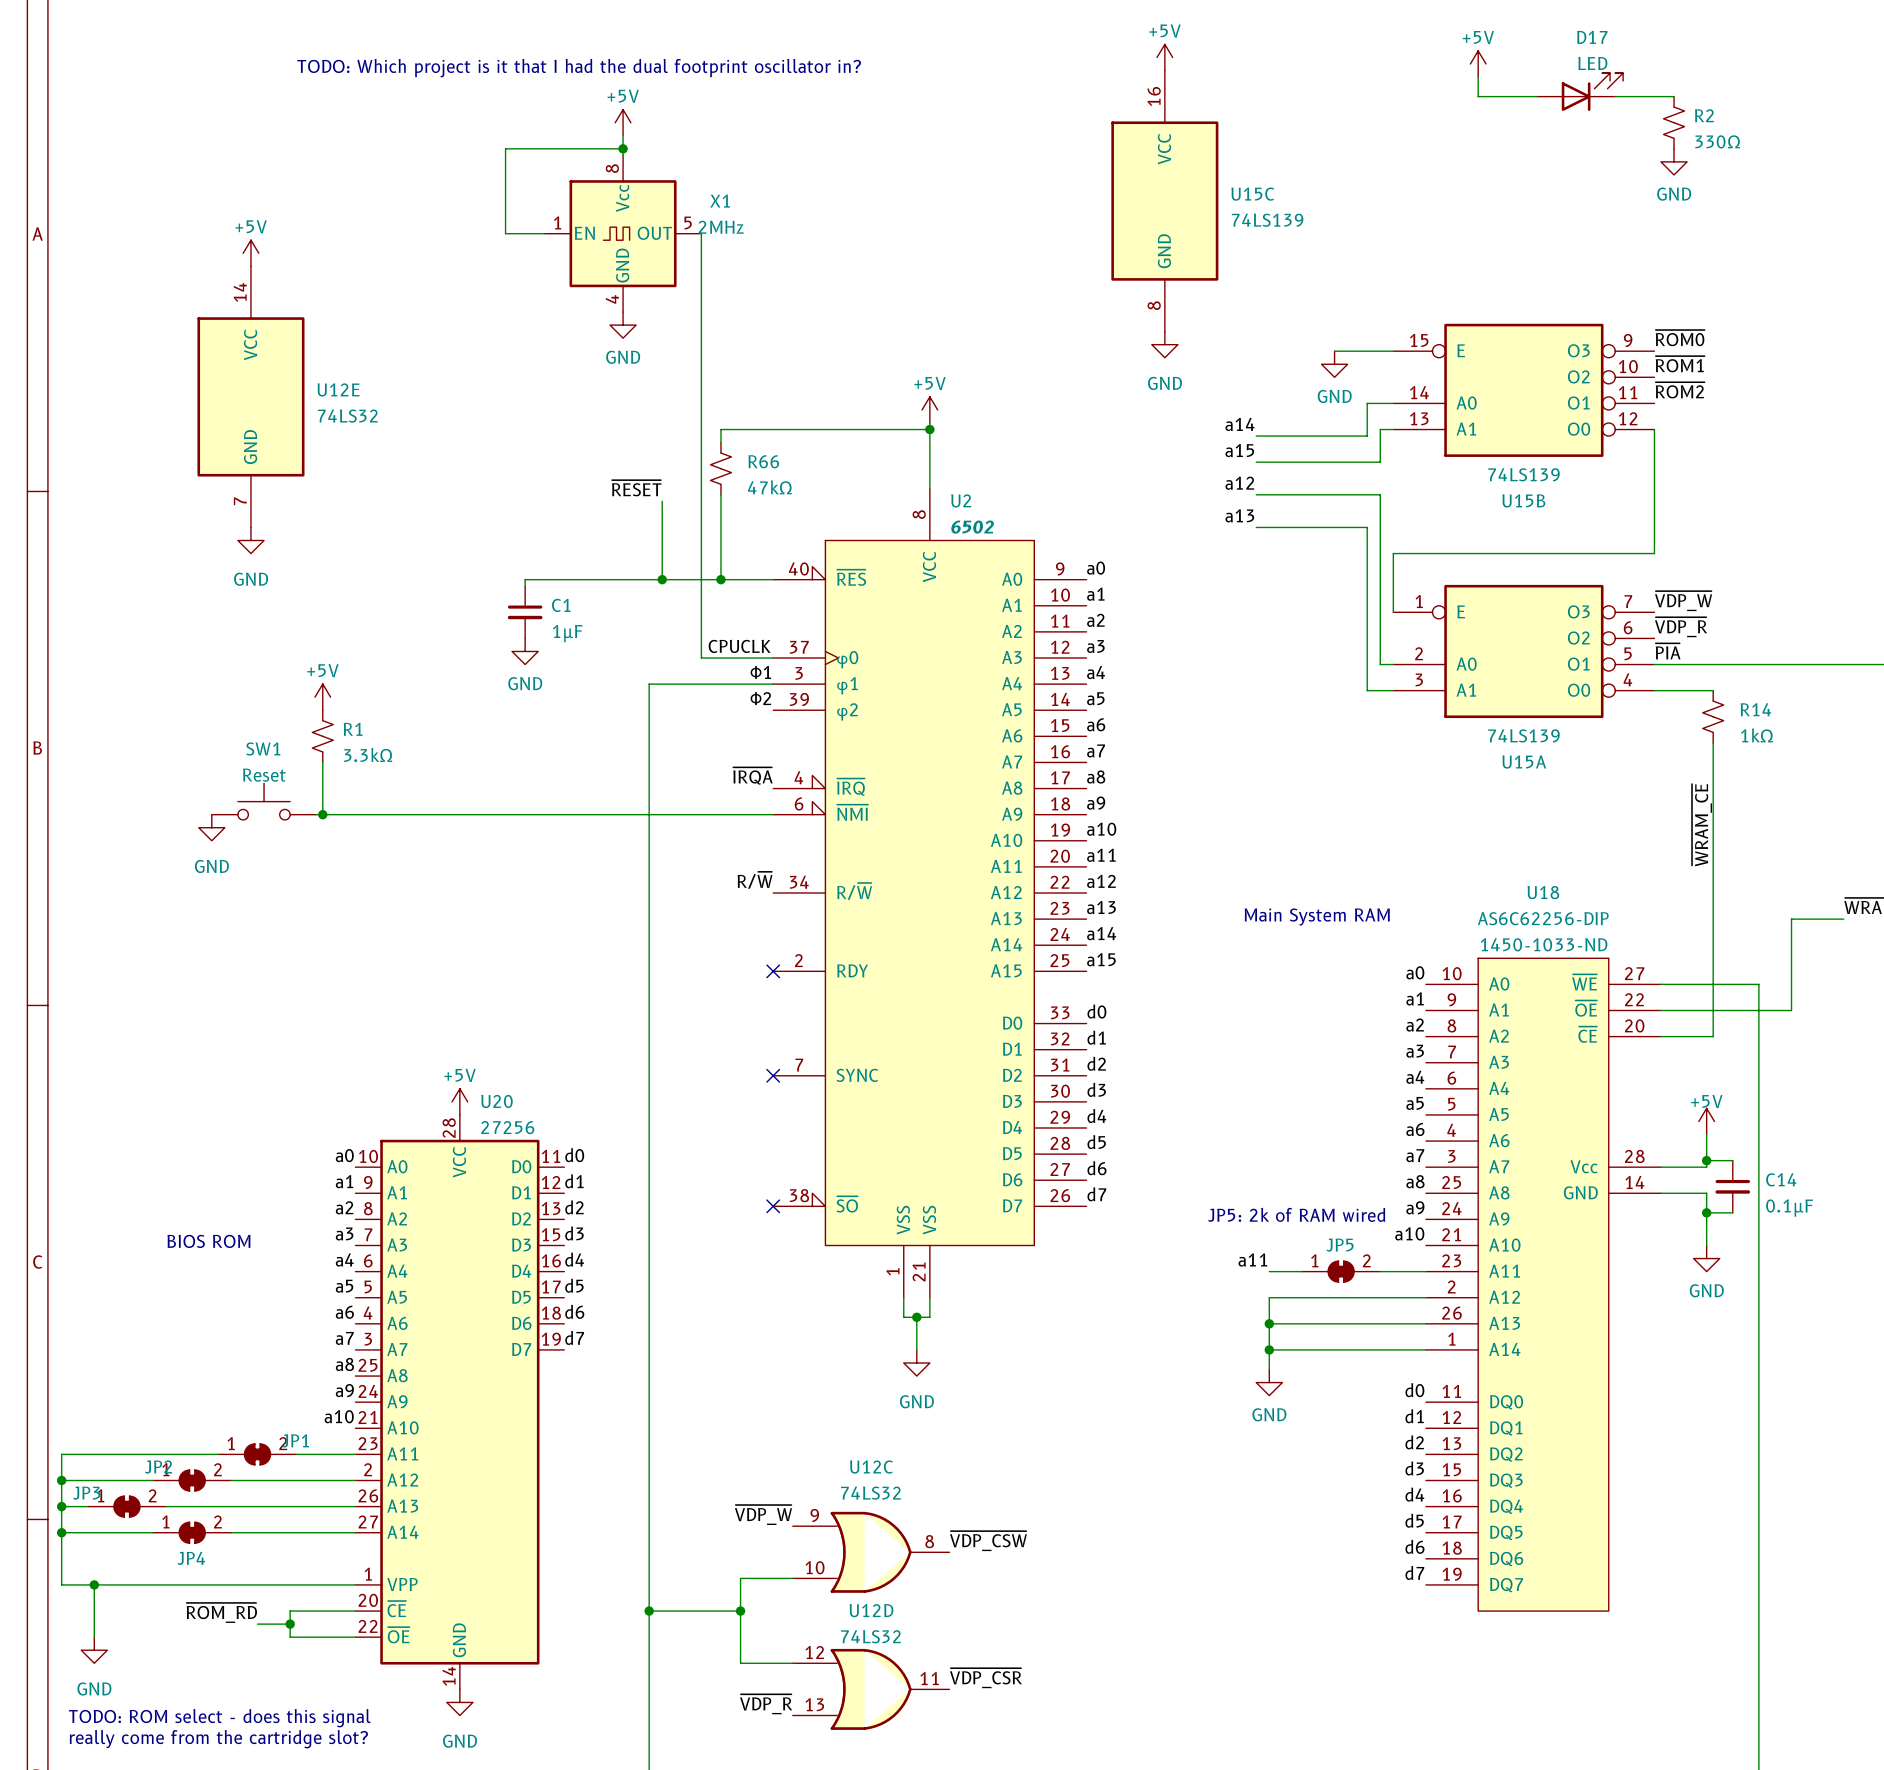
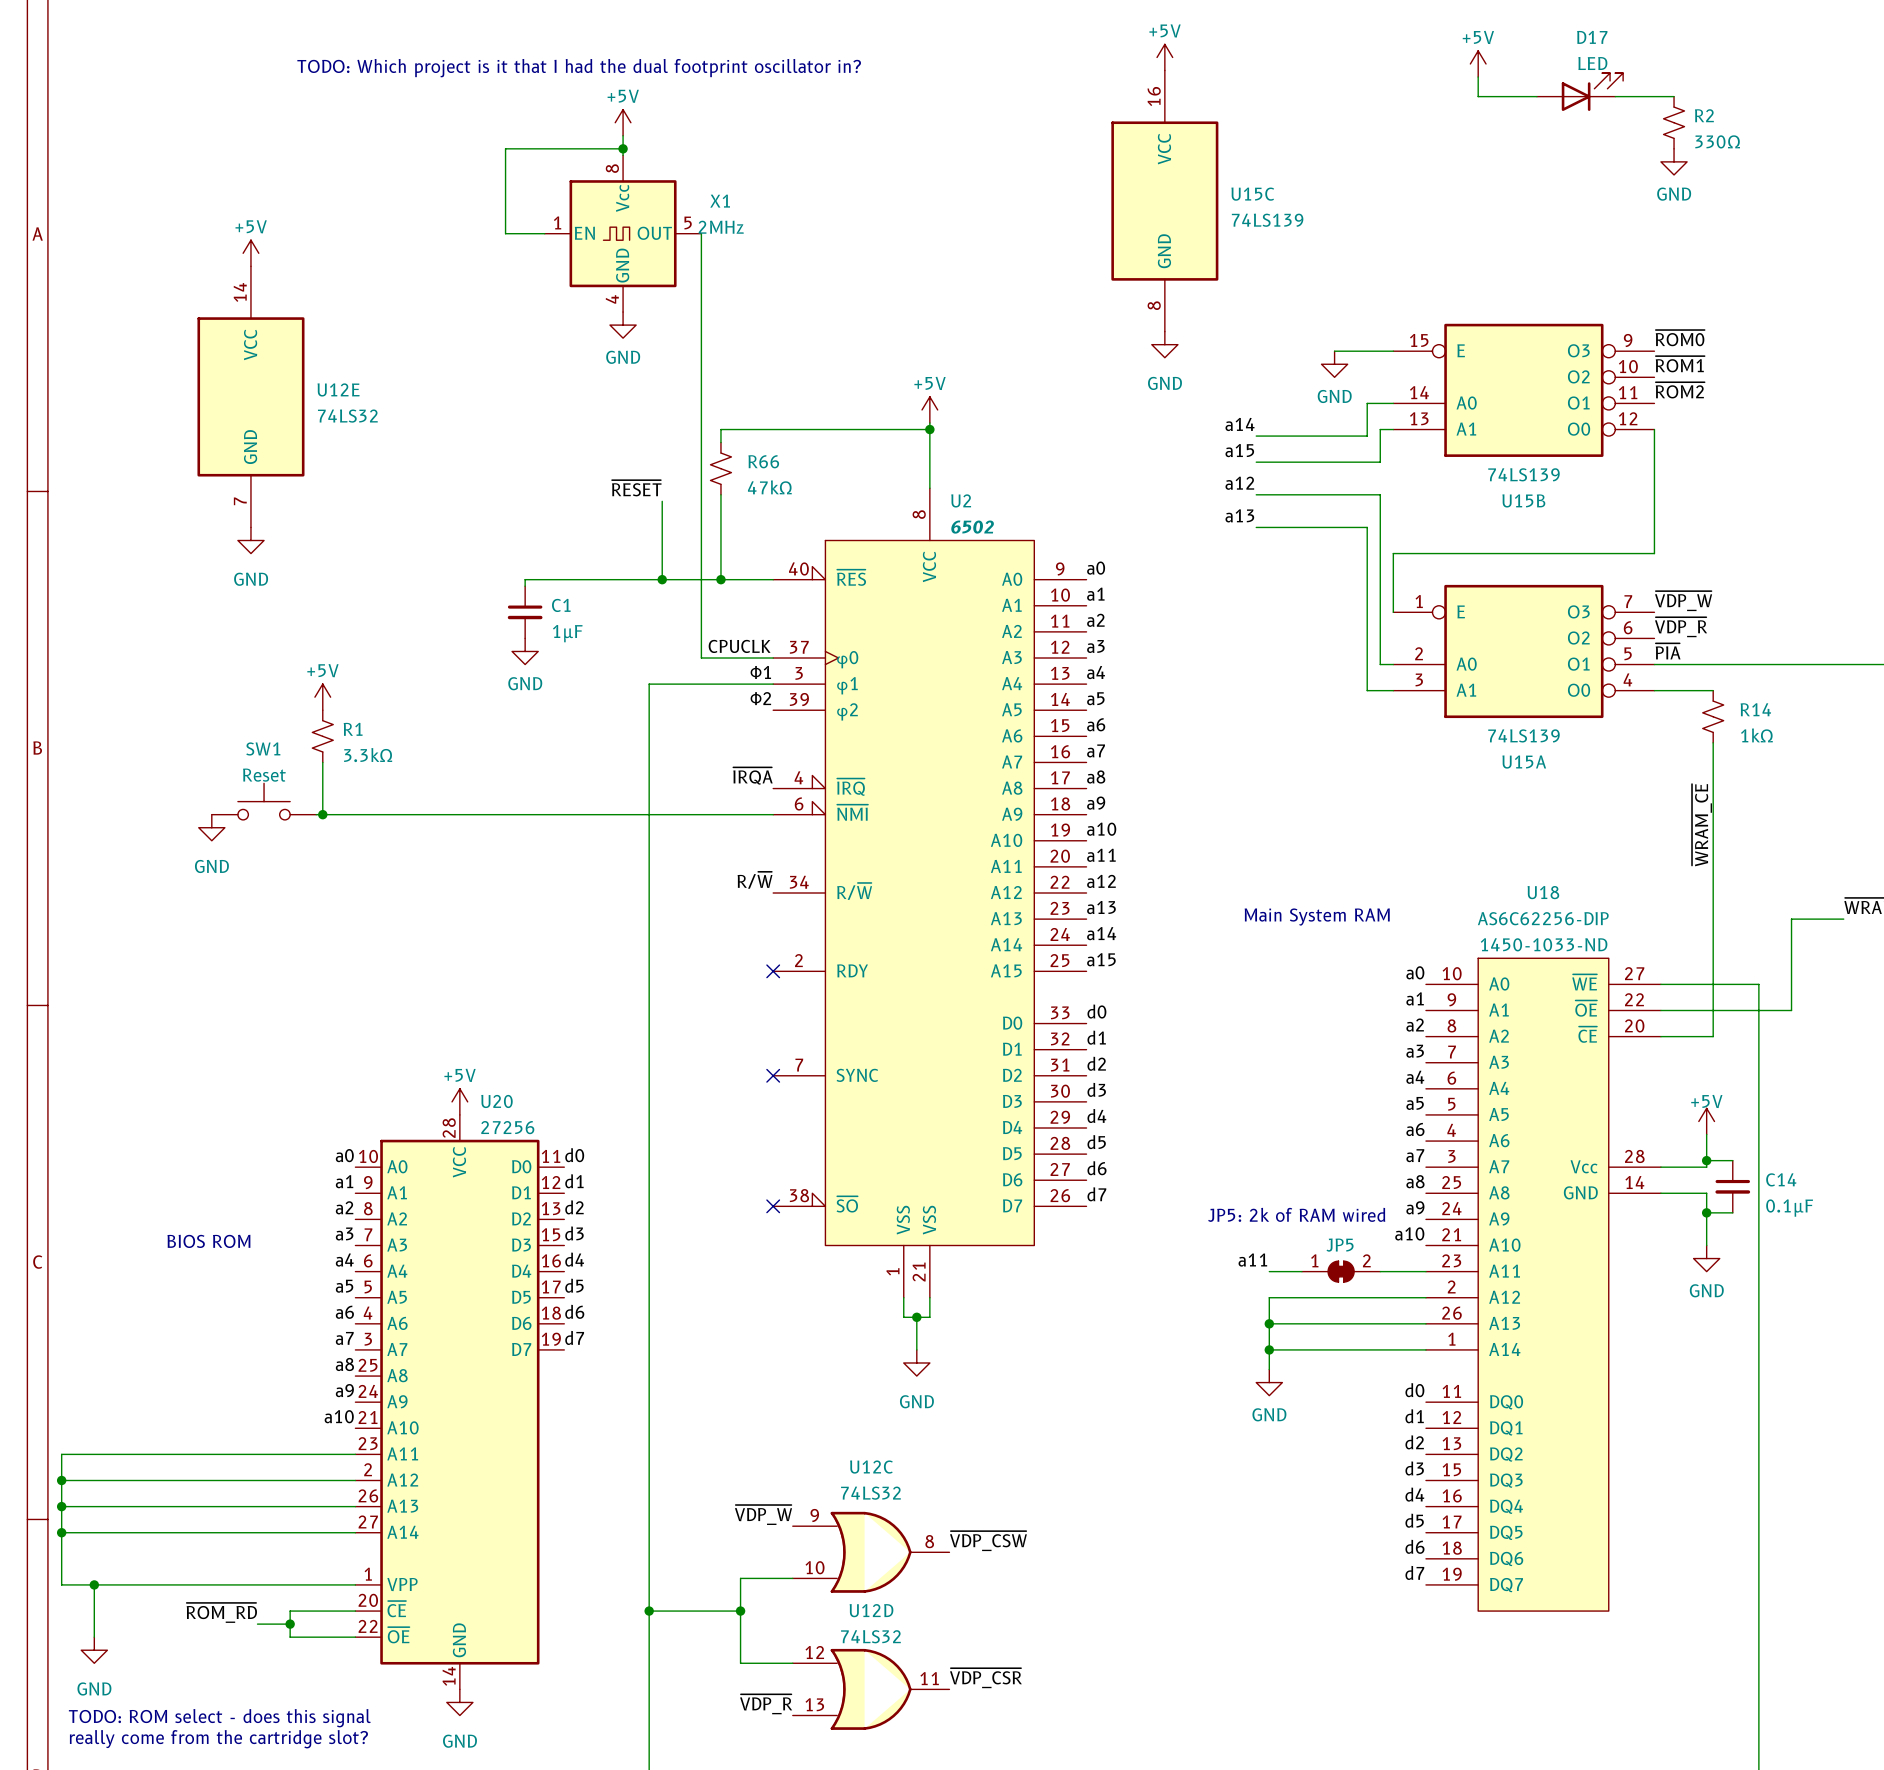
JP1: (257, 1454) -> none
JP2: (192, 1480) -> none
JP3: (126, 1506) -> none
JP4: (192, 1532) -> none

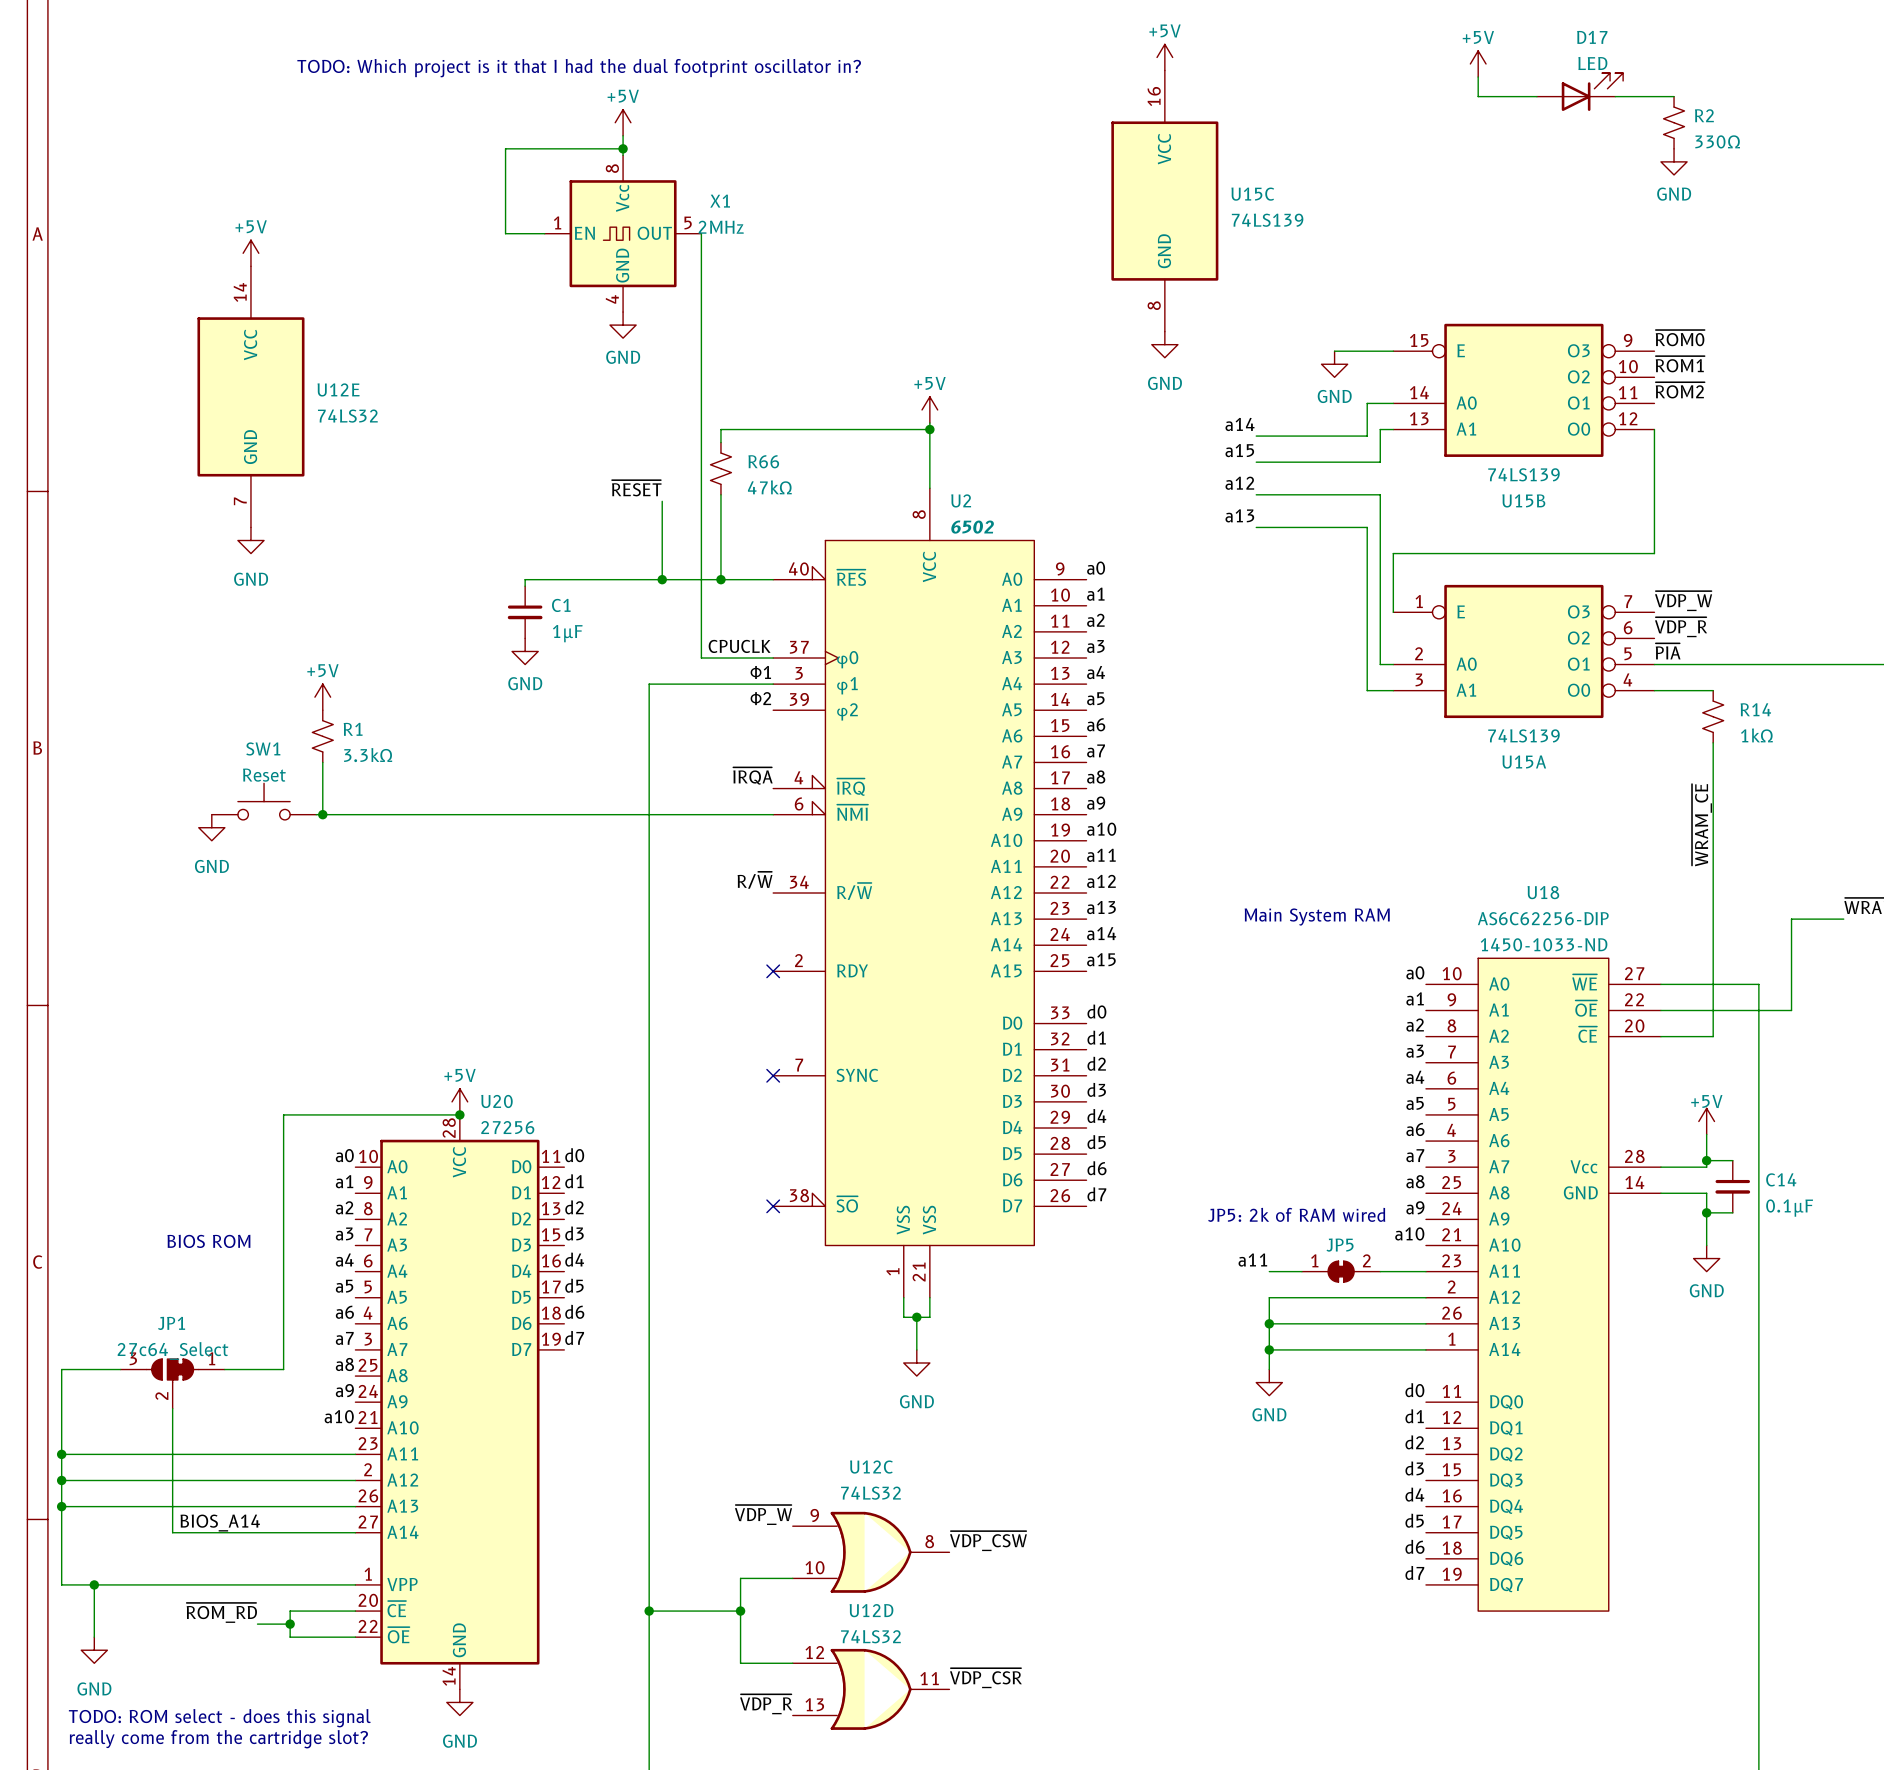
wire: none -> (459, 1114) (283, 1114) (283, 1369) (224, 1369)
junction: none -> (459, 1114)
wire: none -> (120, 1369) (61, 1369) (61, 1454)
JP1: none -> 27c64_Select (172, 1383)
junction: none -> (61, 1454)
label: none -> BIOS_A14 (220, 1523)
wire: (61, 1532) (172, 1532) -> (172, 1408) (172, 1532)
junction: (61, 1532) -> none

